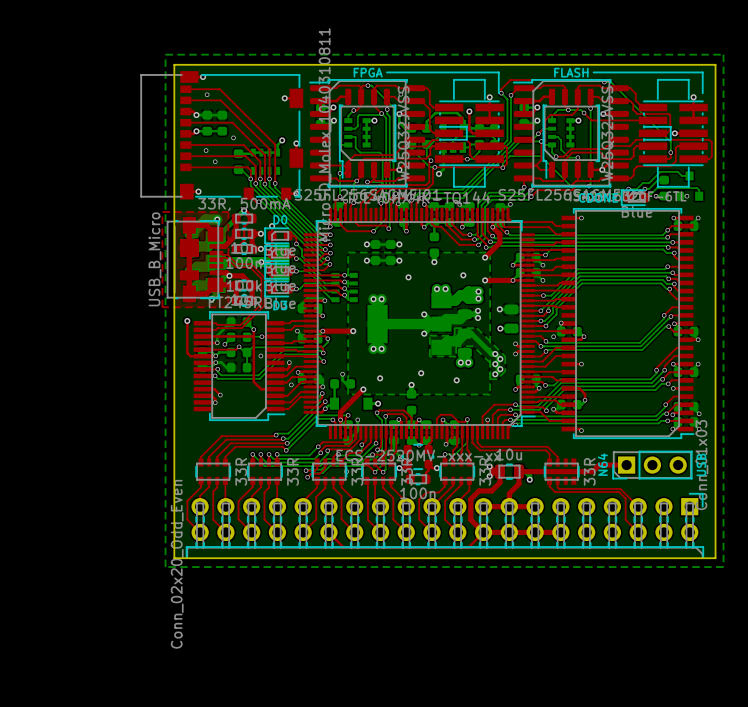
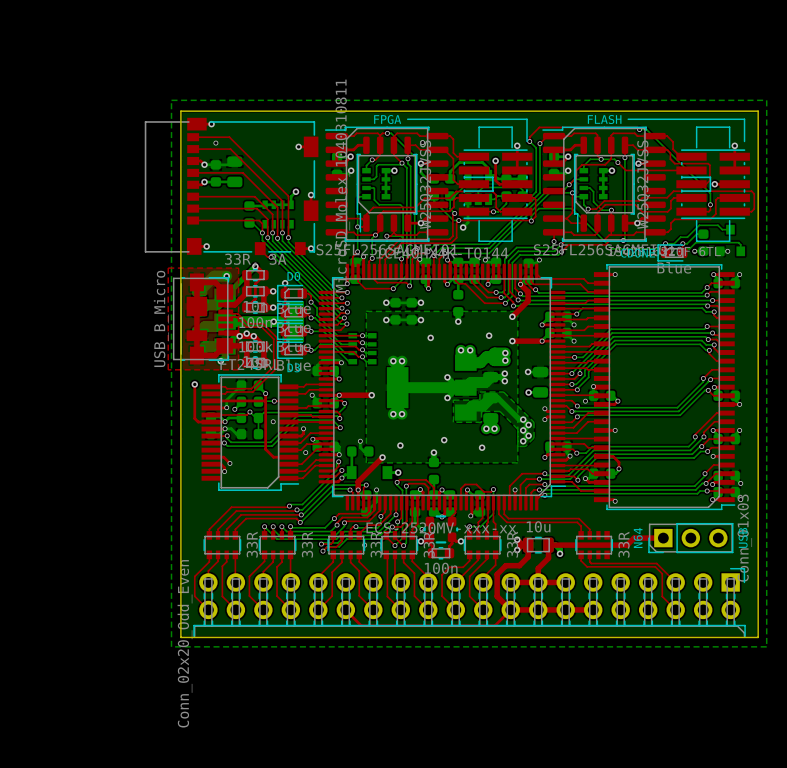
part footprint: [217, 110, 228, 136] -> [227, 156, 243, 188]
via: (233, 137) -> none
via: (206, 150) -> none
via: (215, 161) -> none
part value: 33R, 500mA (244, 204) -> 33R, 3A (255, 260)
via: none -> (246, 333)
via: none -> (253, 336)

